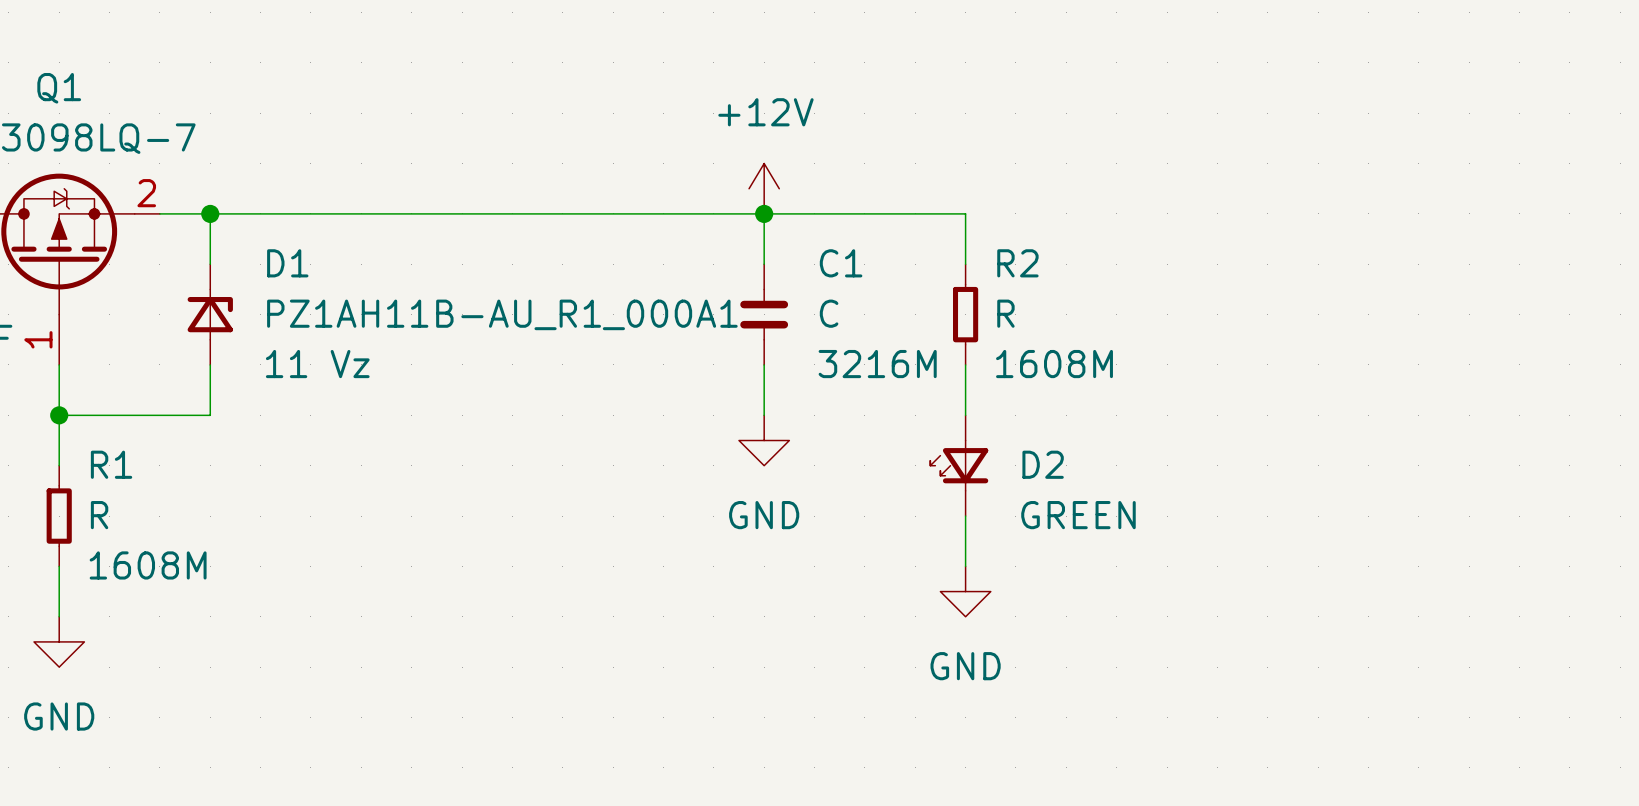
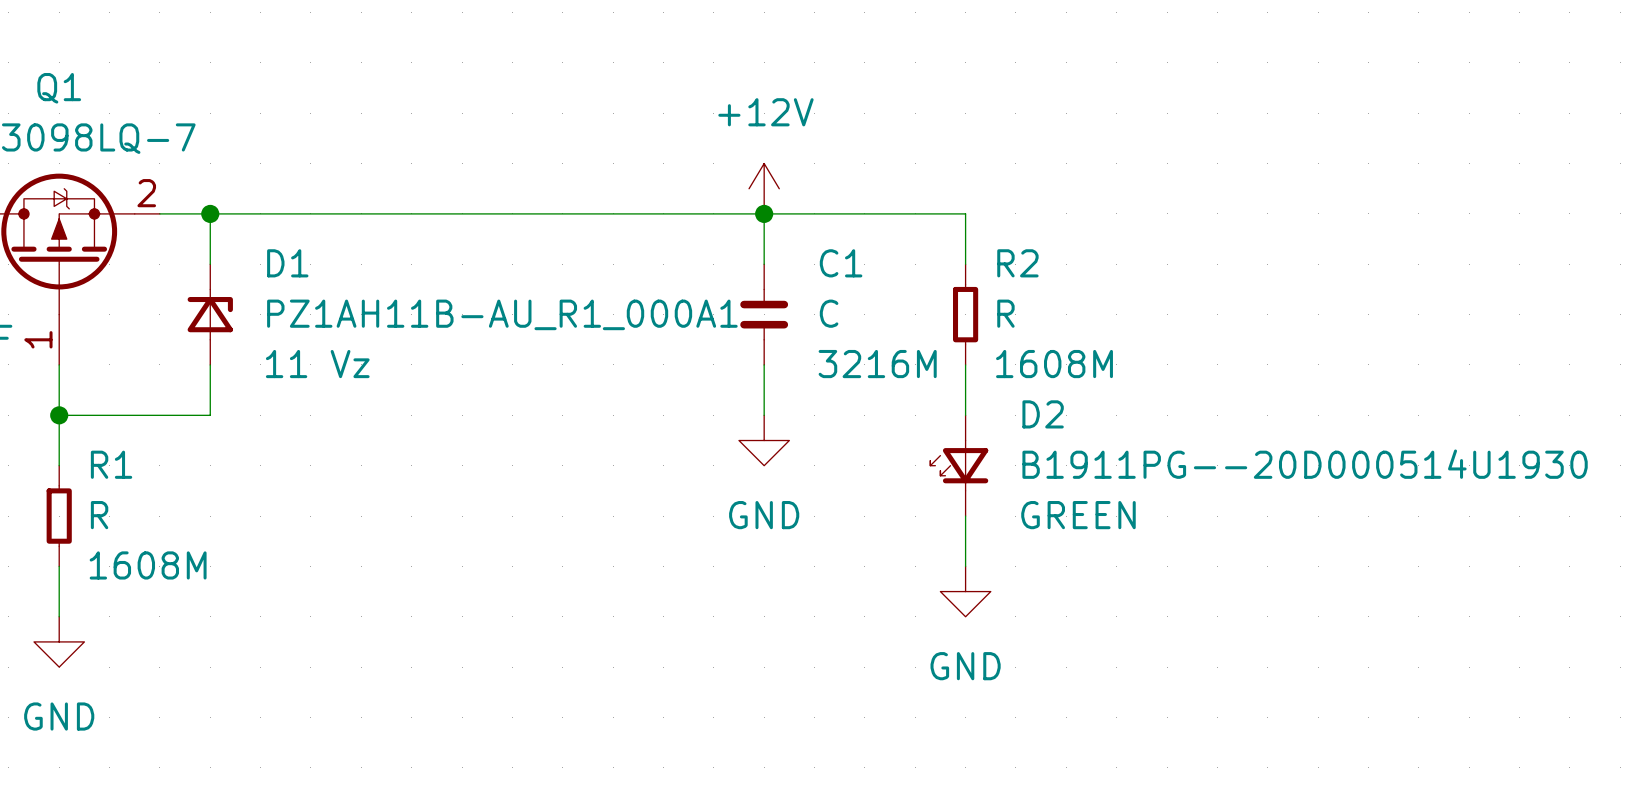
D2 name position: D2 (1043, 464) -> D2 (1043, 414)
D2 value: none -> B1911PG--20D000514U1930 (1305, 464)

